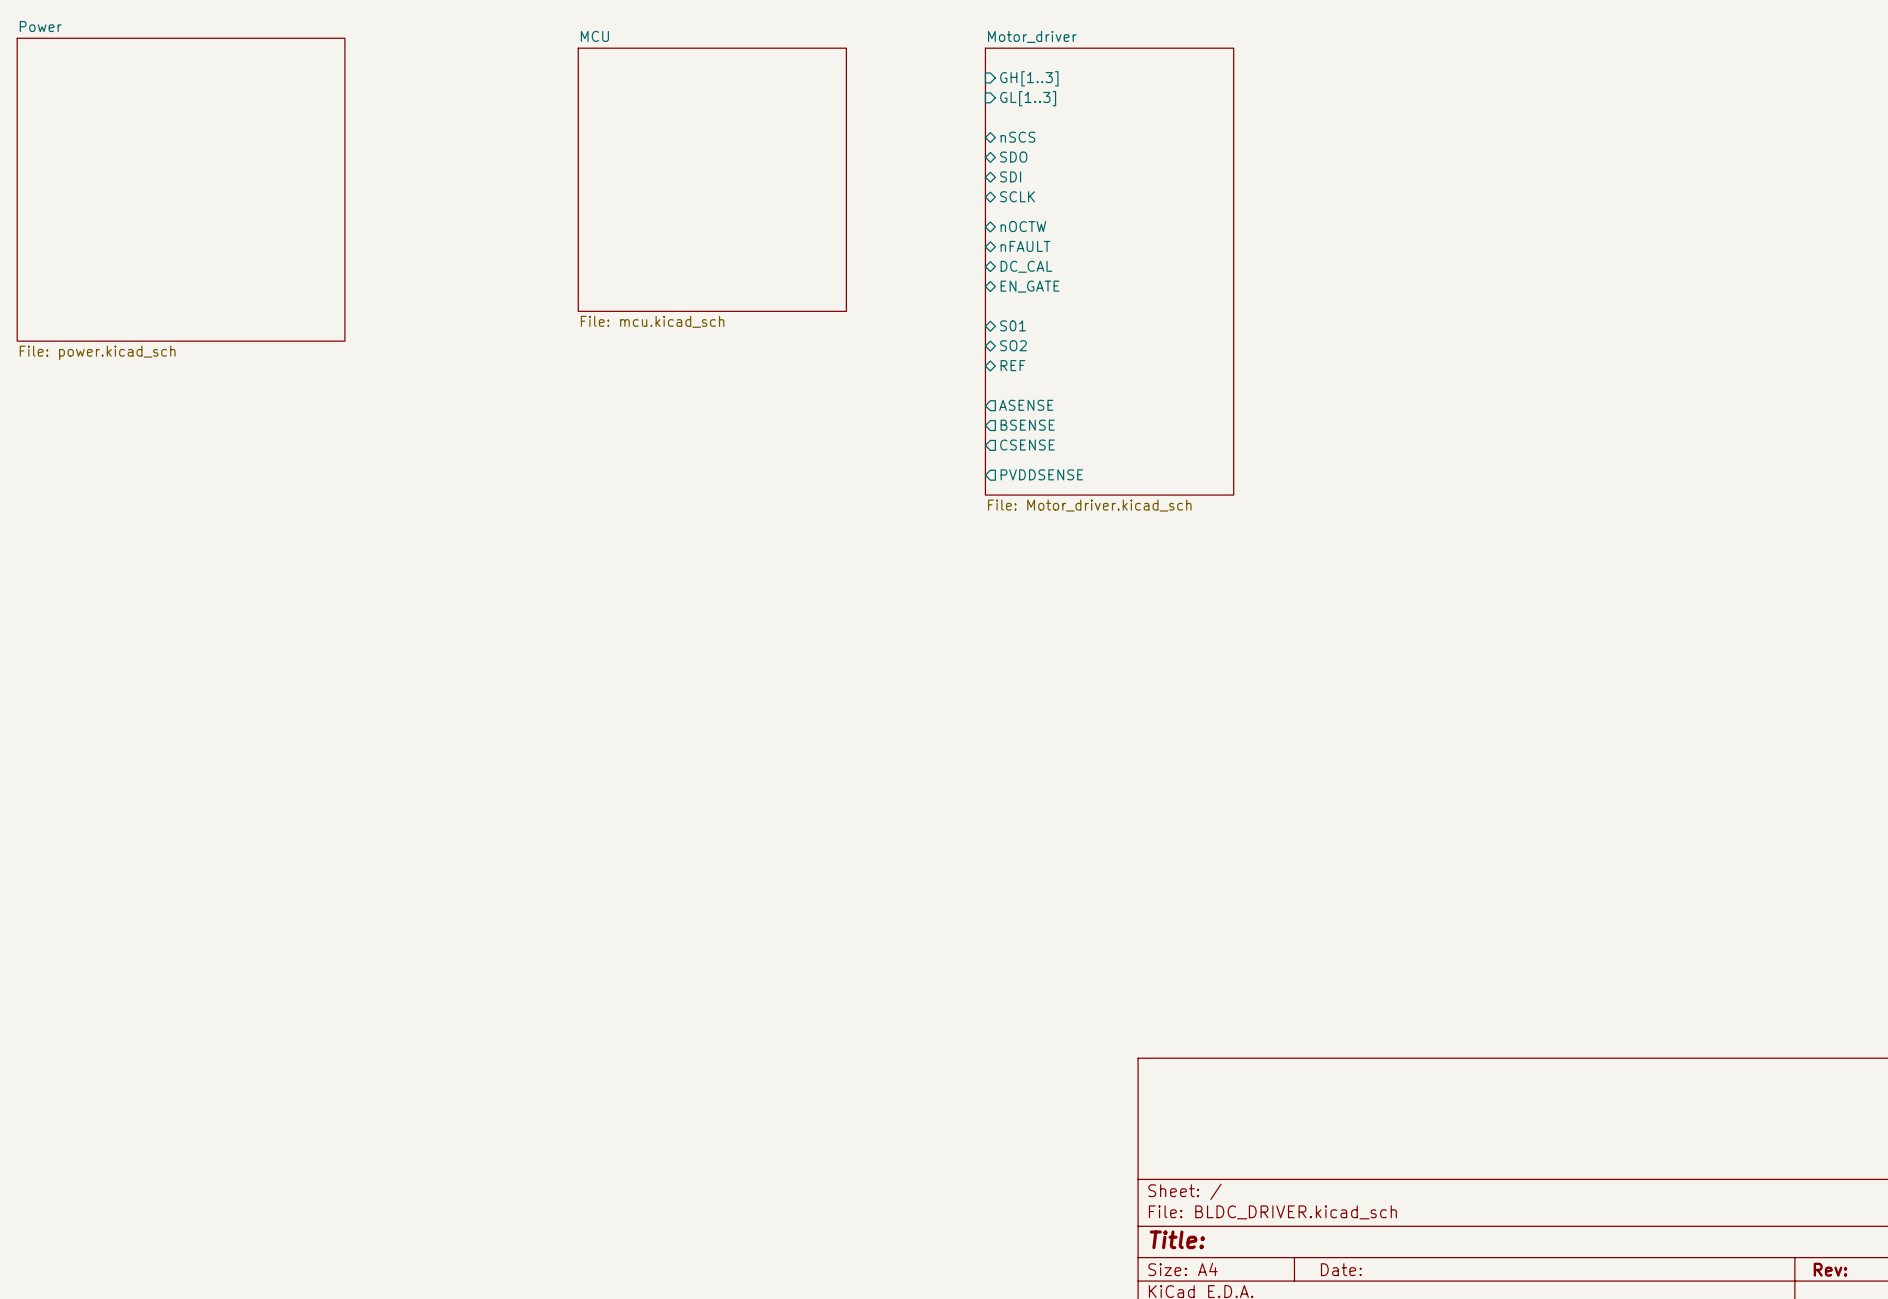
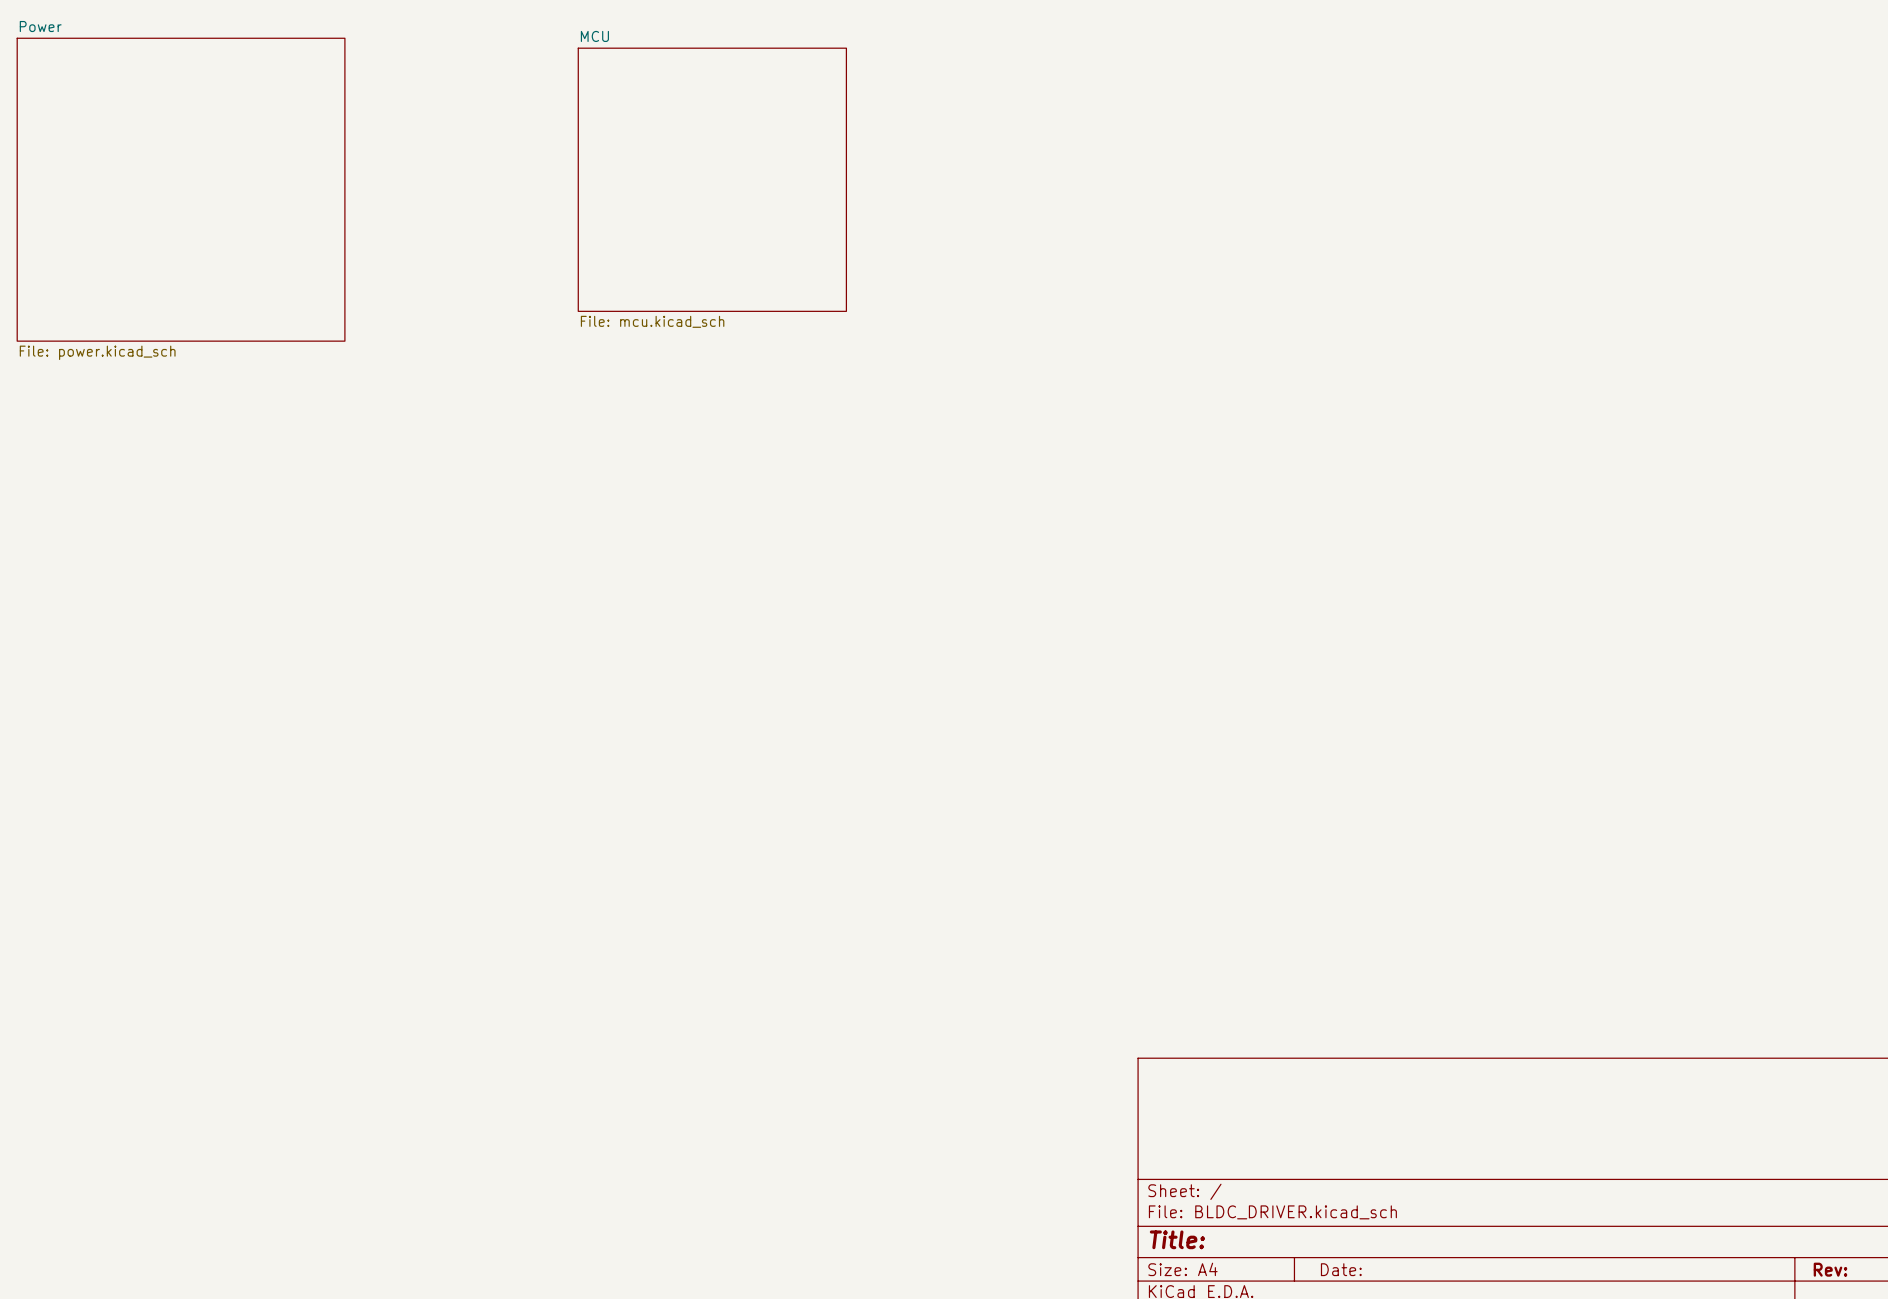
sheet pin: GH[1..3] (1029, 78) -> none
sheet pin: GL[1..3] (1028, 98) -> none
sheet pin: nSCS (1017, 137) -> none
sheet pin: SDO (1013, 157) -> none
sheet pin: SDI (1010, 176) -> none
sheet pin: SCLK (1017, 196) -> none
sheet pin: nOCTW (1023, 226) -> none
sheet pin: nFAULT (1025, 246) -> none
sheet pin: DC_CAL (1026, 266) -> none
sheet Motor_driver: File: Motor_driver.kicad_sch (1109, 271) -> none
sheet pin: EN_GATE (1030, 286) -> none
sheet pin: S01 (1013, 325) -> none
sheet pin: SO2 (1013, 345) -> none
sheet pin: REF (1013, 365) -> none
sheet pin: ASENSE (1026, 405) -> none
sheet pin: BSENSE (1027, 425) -> none
sheet pin: CSENSE (1027, 445) -> none
sheet pin: PVDDSENSE (1041, 474) -> none

